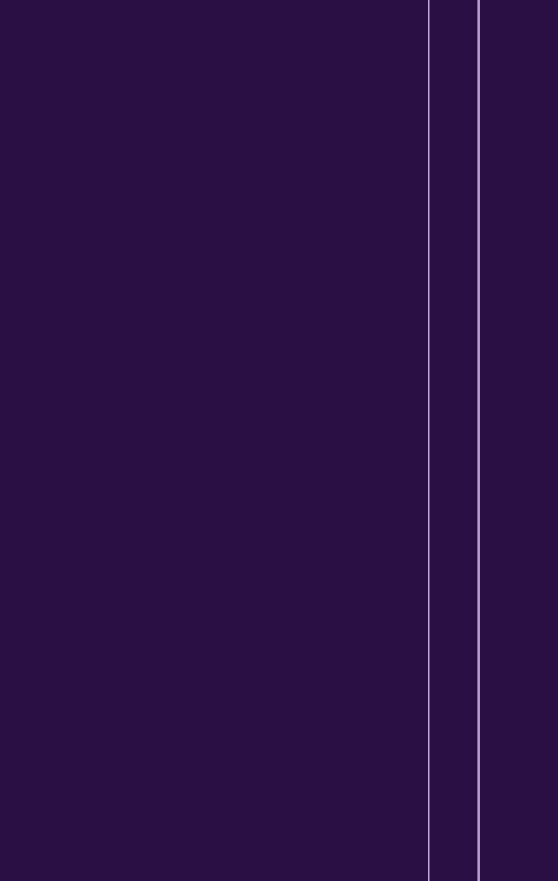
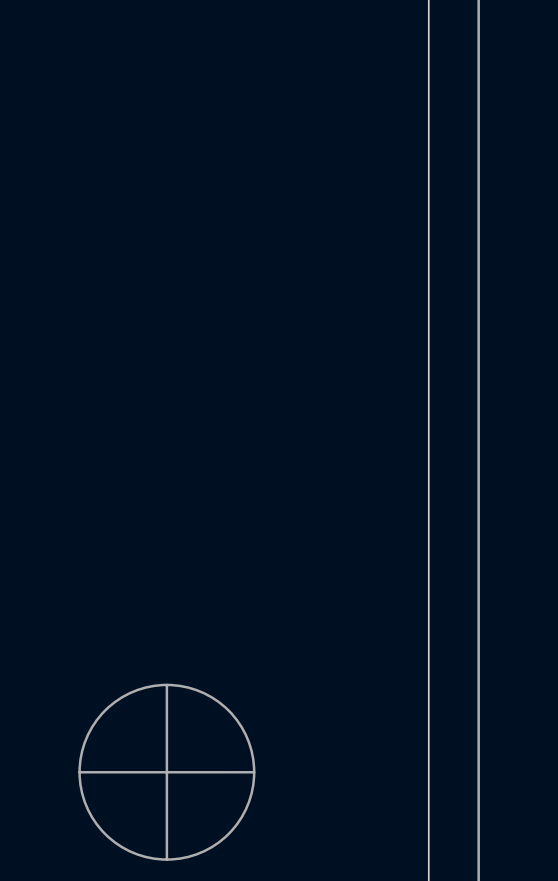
drawing: none -> [78, 683, 256, 861]
line: none -> (166, 684) (166, 859)
line: none -> (79, 772) (254, 772)

